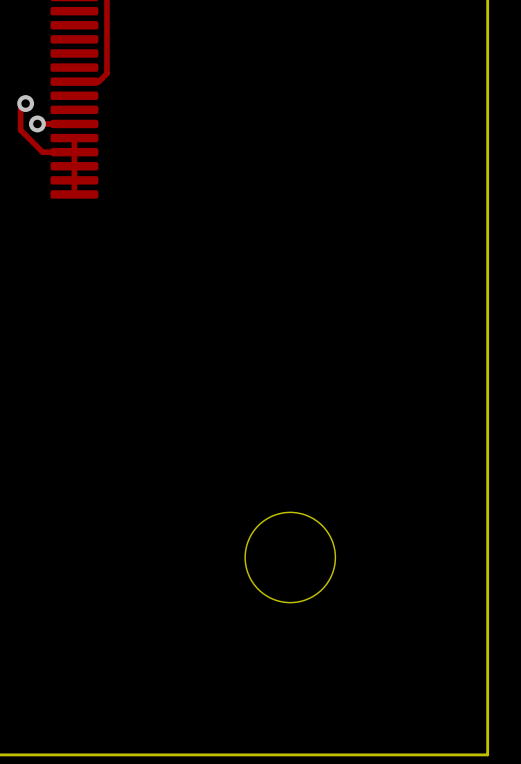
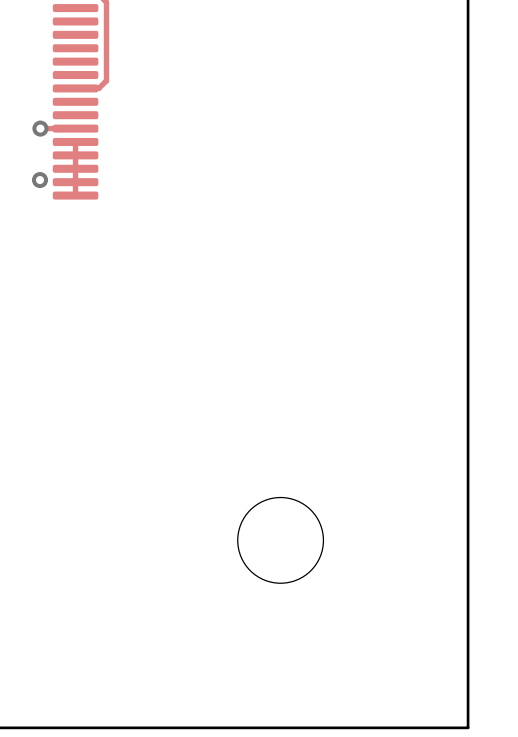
top track: (25, 103) (20, 108) (20, 130) (42, 152) (74, 152) -> none
via position: (25, 103) -> (40, 180)

